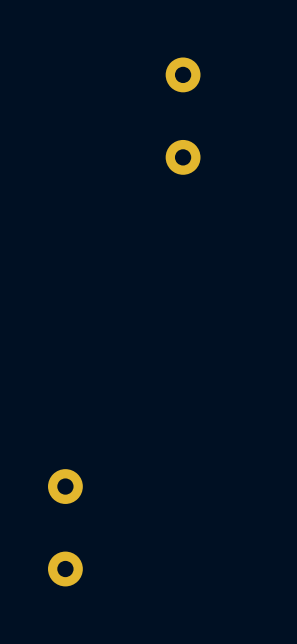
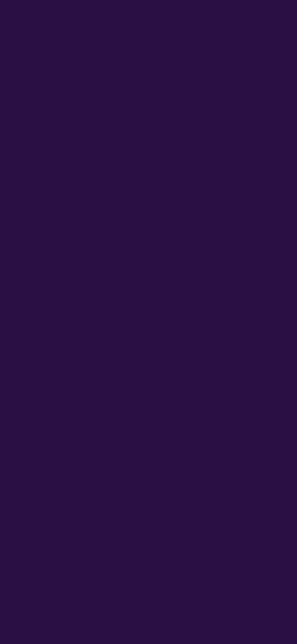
part: (183, 74) -> none
part: (183, 157) -> none
part: (65, 486) -> none
part: (65, 569) -> none

